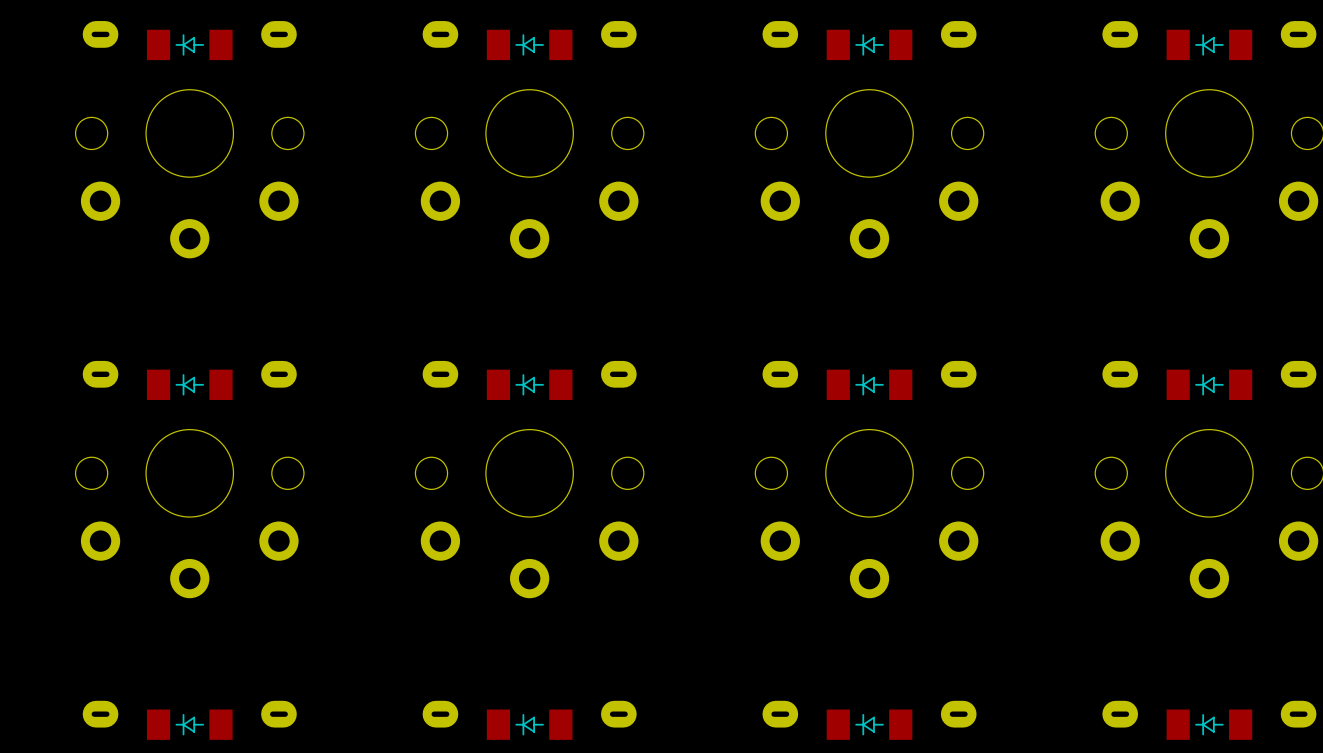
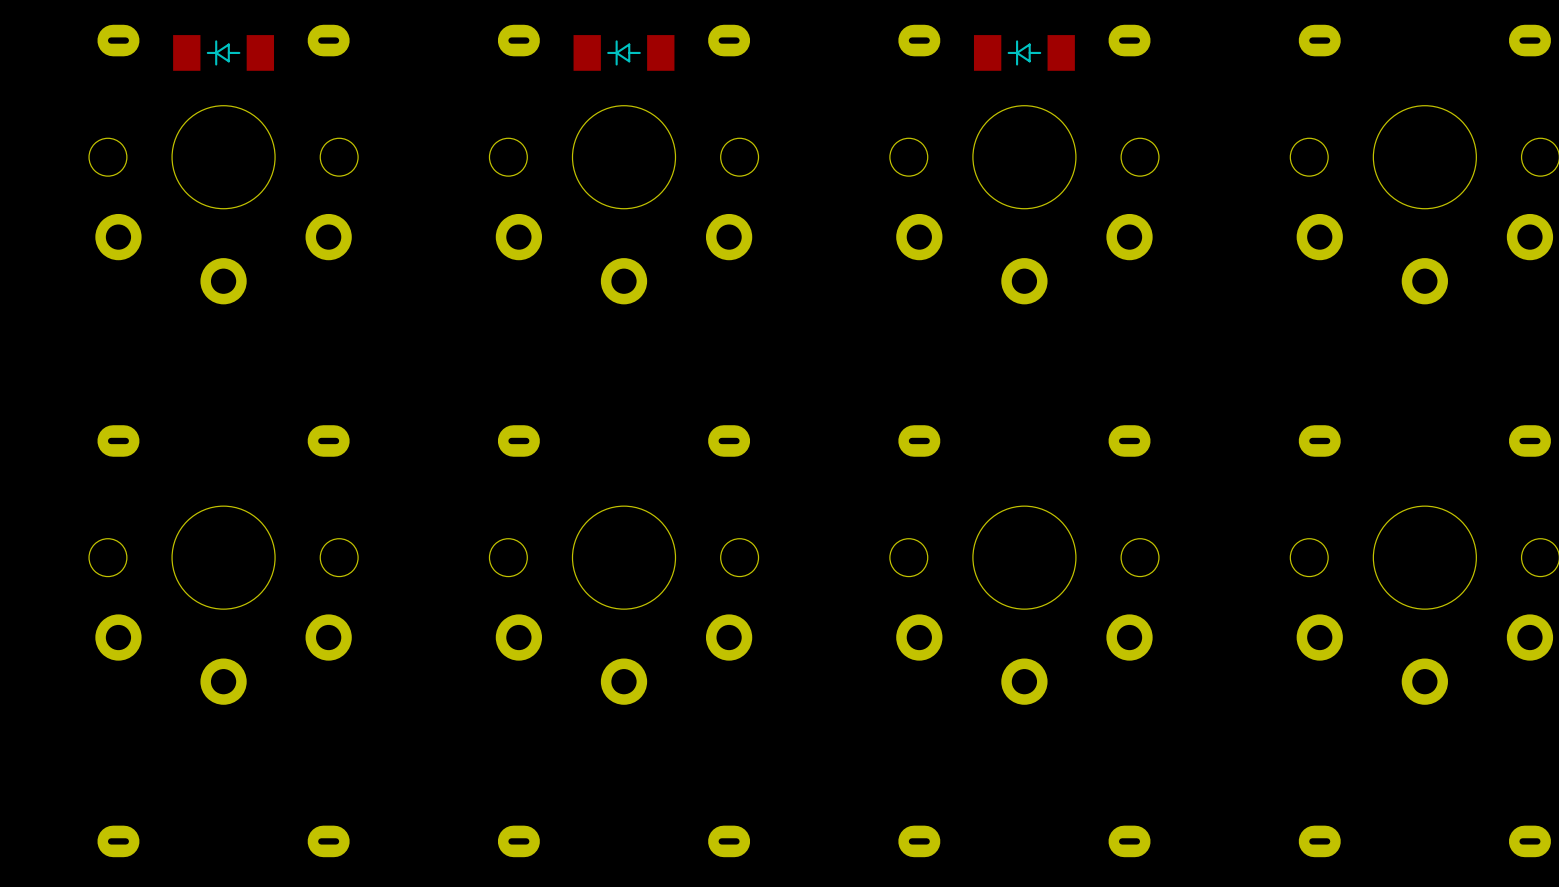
part: (1209, 44) -> none
part: (189, 384) -> none
part: (529, 384) -> none
part: (869, 384) -> none
part: (1209, 384) -> none
part: (189, 724) -> none
part: (529, 724) -> none
part: (869, 724) -> none
part: (1209, 724) -> none

